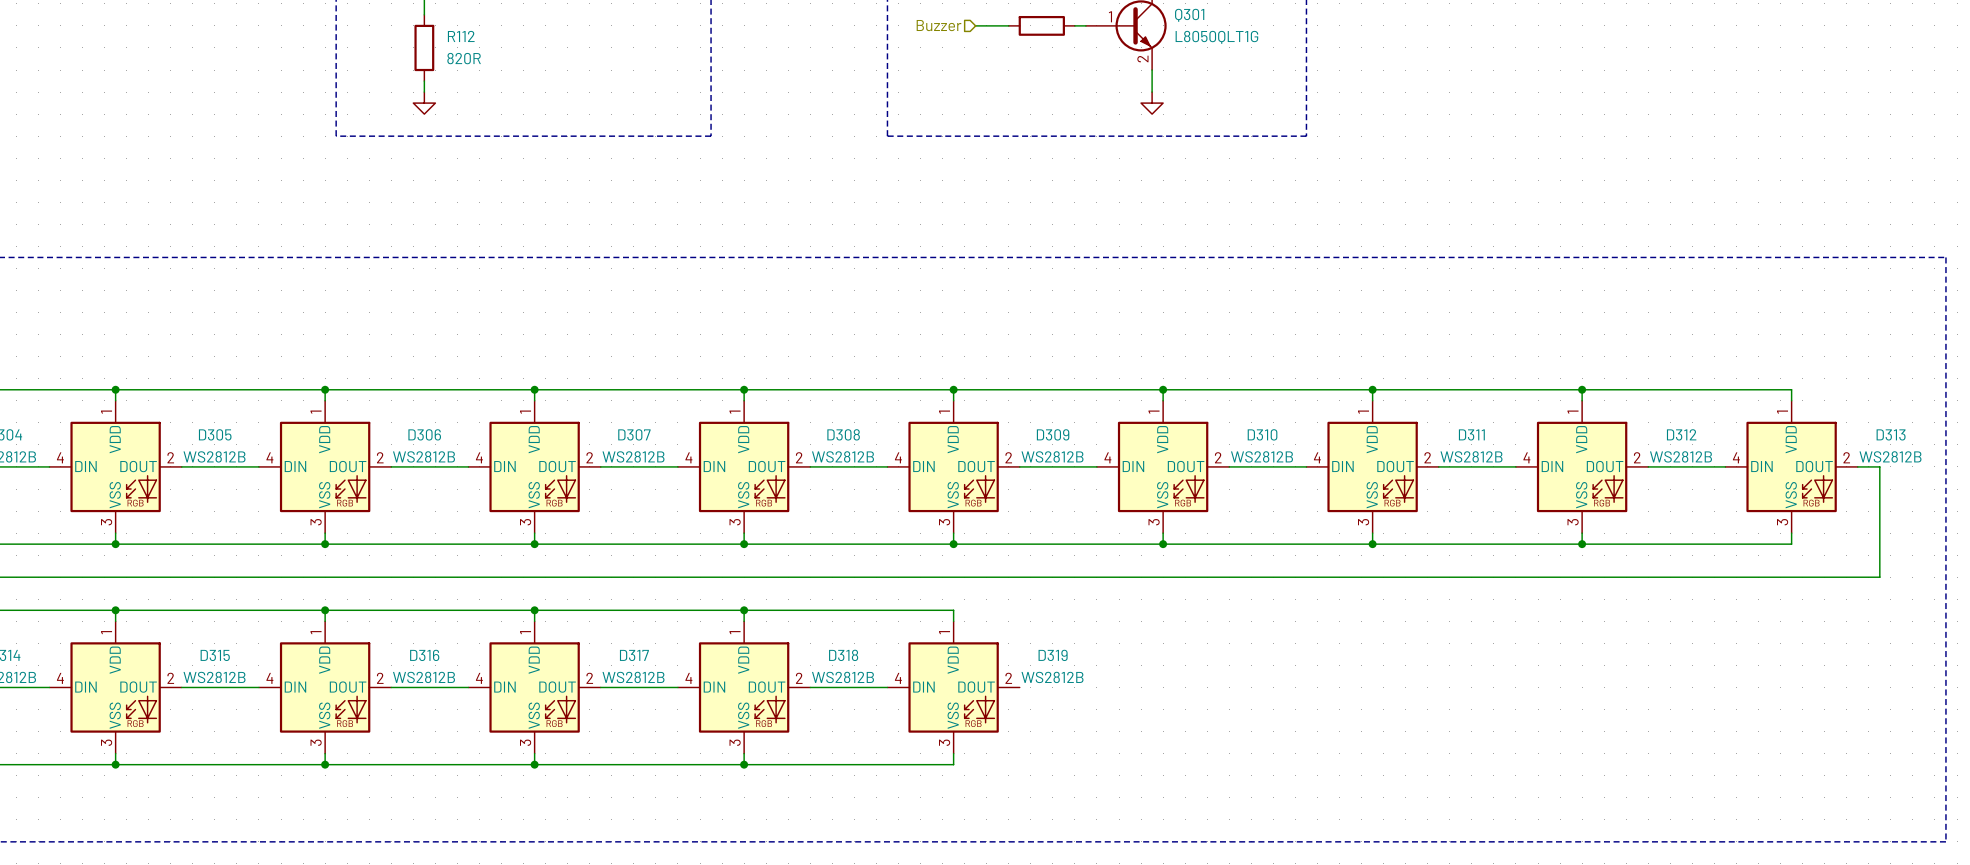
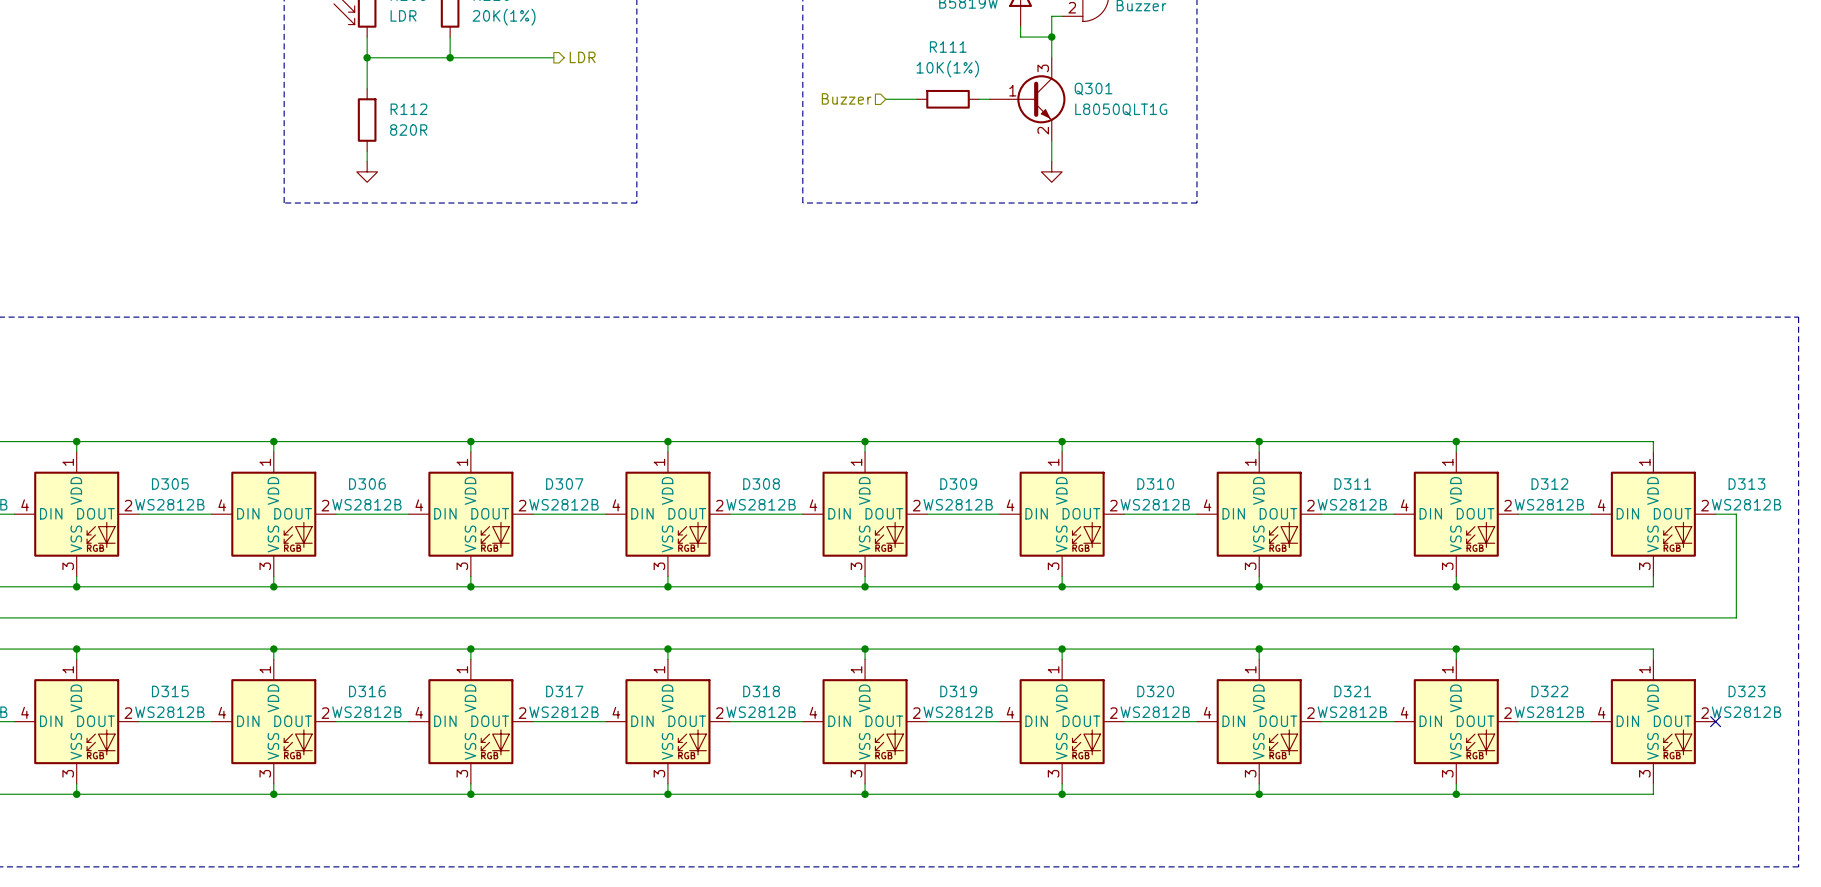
wire: none -> (865, 649) (1653, 649) (1653, 659)
junction: none -> (865, 649)
wire: none -> (1062, 649) (1062, 659)
junction: none -> (1062, 649)
wire: none -> (1259, 649) (1259, 659)
junction: none -> (1259, 649)
wire: none -> (1456, 649) (1456, 659)
junction: none -> (1456, 649)
wire: none -> (927, 721) (999, 721)
D320: none -> WS2812B (1062, 721)
wire: none -> (1124, 721) (1196, 721)
D321: none -> WS2812B (1259, 721)
wire: none -> (1321, 721) (1394, 721)
D322: none -> WS2812B (1456, 721)
wire: none -> (1518, 721) (1591, 721)
D323: none -> WS2812B (1653, 721)
no-connect mark: none -> (1715, 721)
wire: none -> (1062, 783) (1062, 794)
wire: none -> (1259, 783) (1259, 794)
wire: none -> (1456, 783) (1456, 794)
wire: none -> (1653, 783) (1653, 794) (865, 794)
junction: none -> (865, 794)
junction: none -> (1062, 794)
junction: none -> (1259, 794)
junction: none -> (1456, 794)

